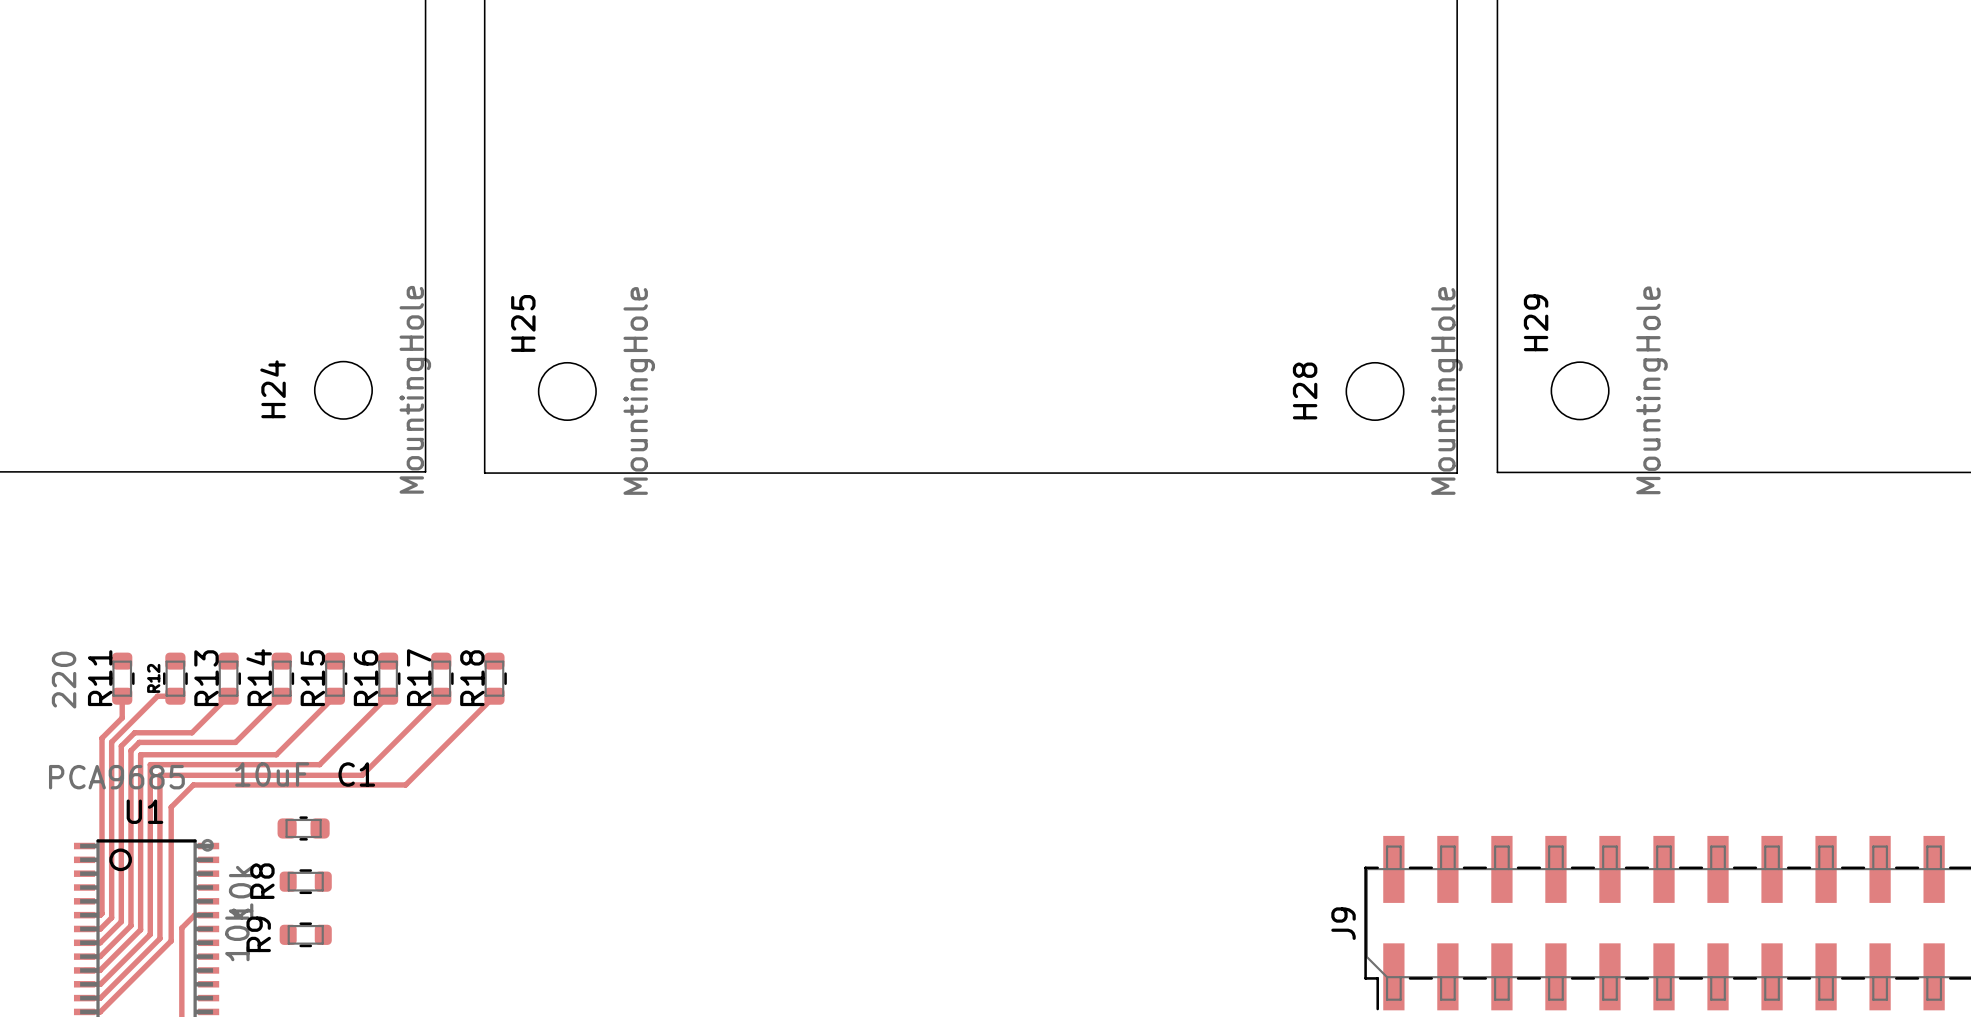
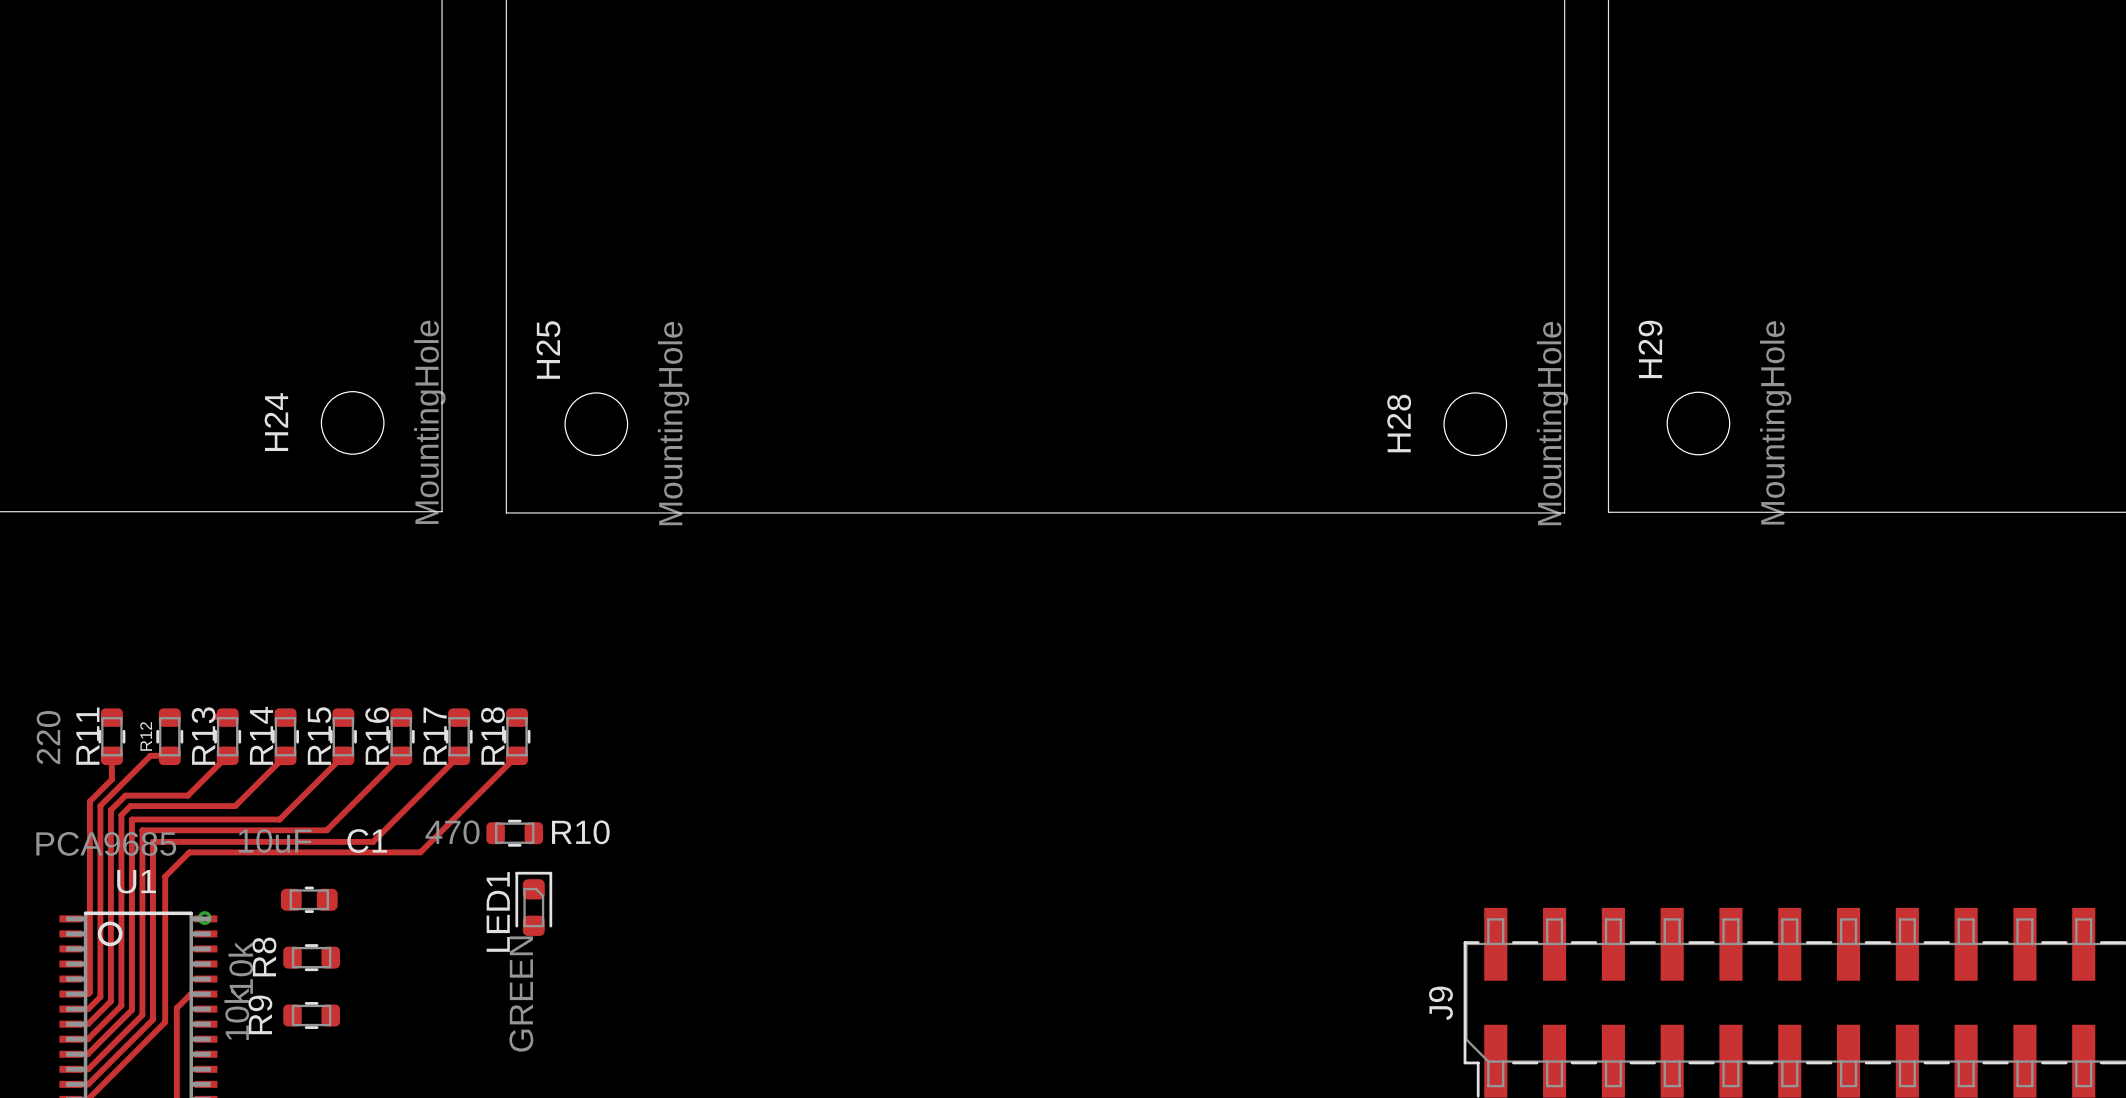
R10: none -> 470 (514, 833)
LED1: none -> GREEN (533, 903)

